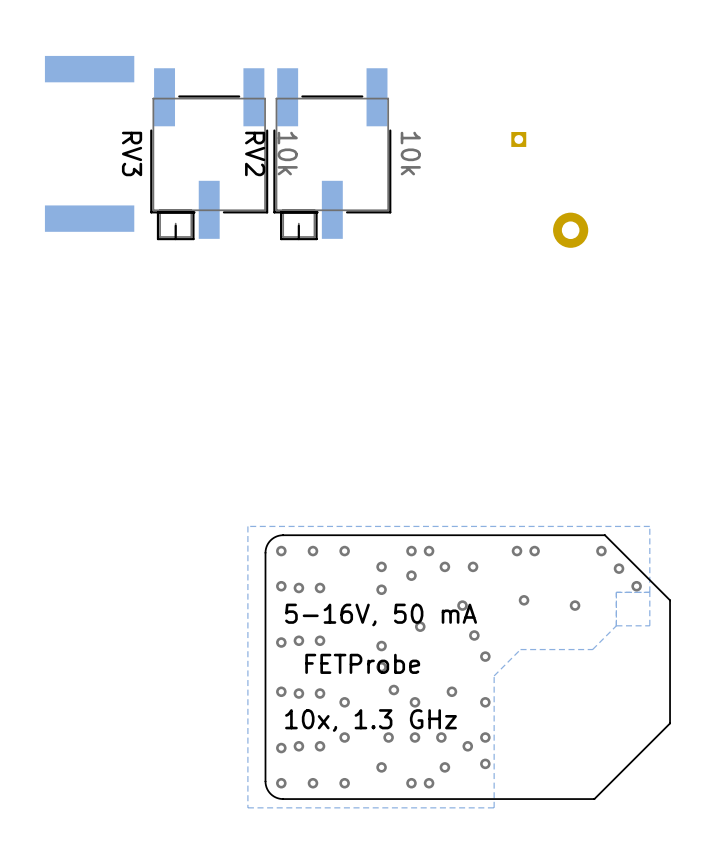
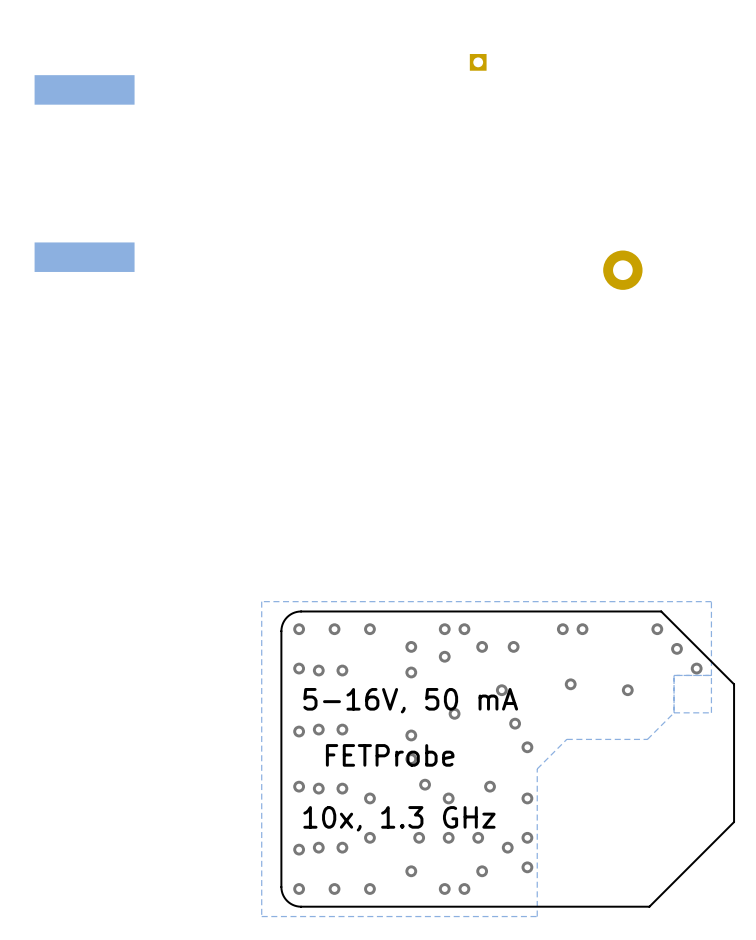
part position: (518, 139) -> (478, 62)
RV3: 10k (209, 154) -> none
RV2: 10k (332, 154) -> none

